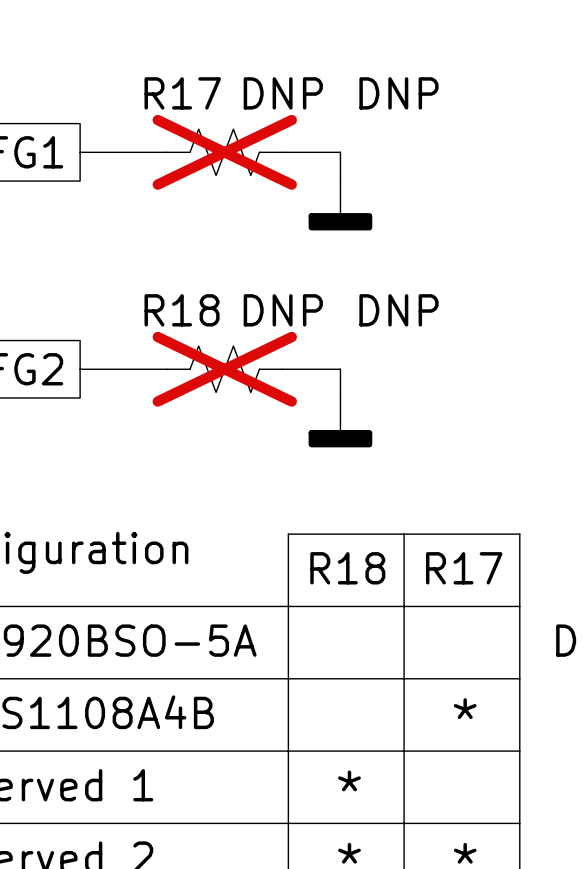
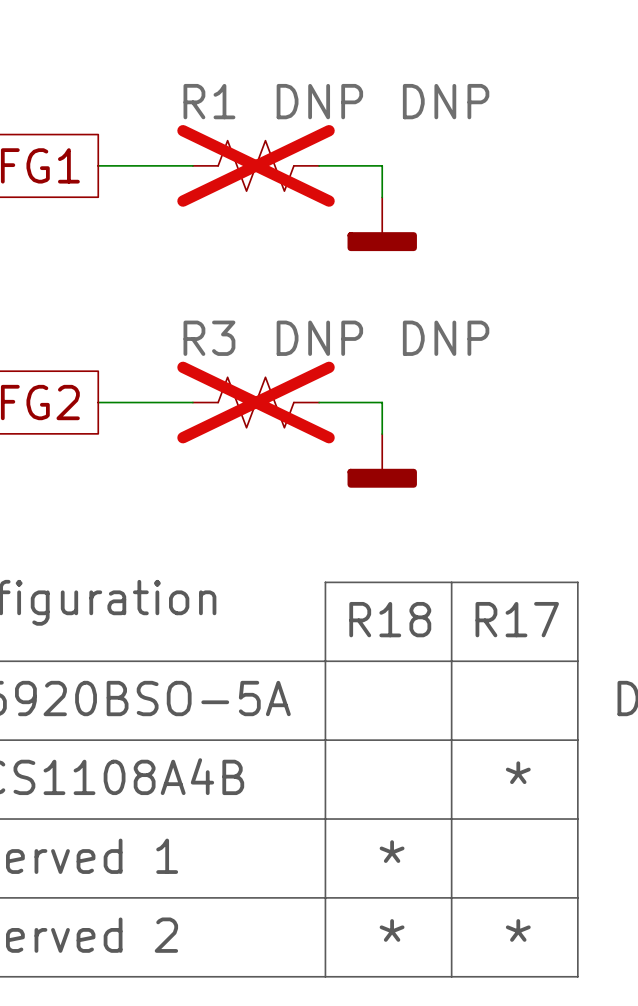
R17 name: R17 (182, 93) -> R1 (209, 101)
R18 name: R18 (182, 310) -> R3 (209, 338)

